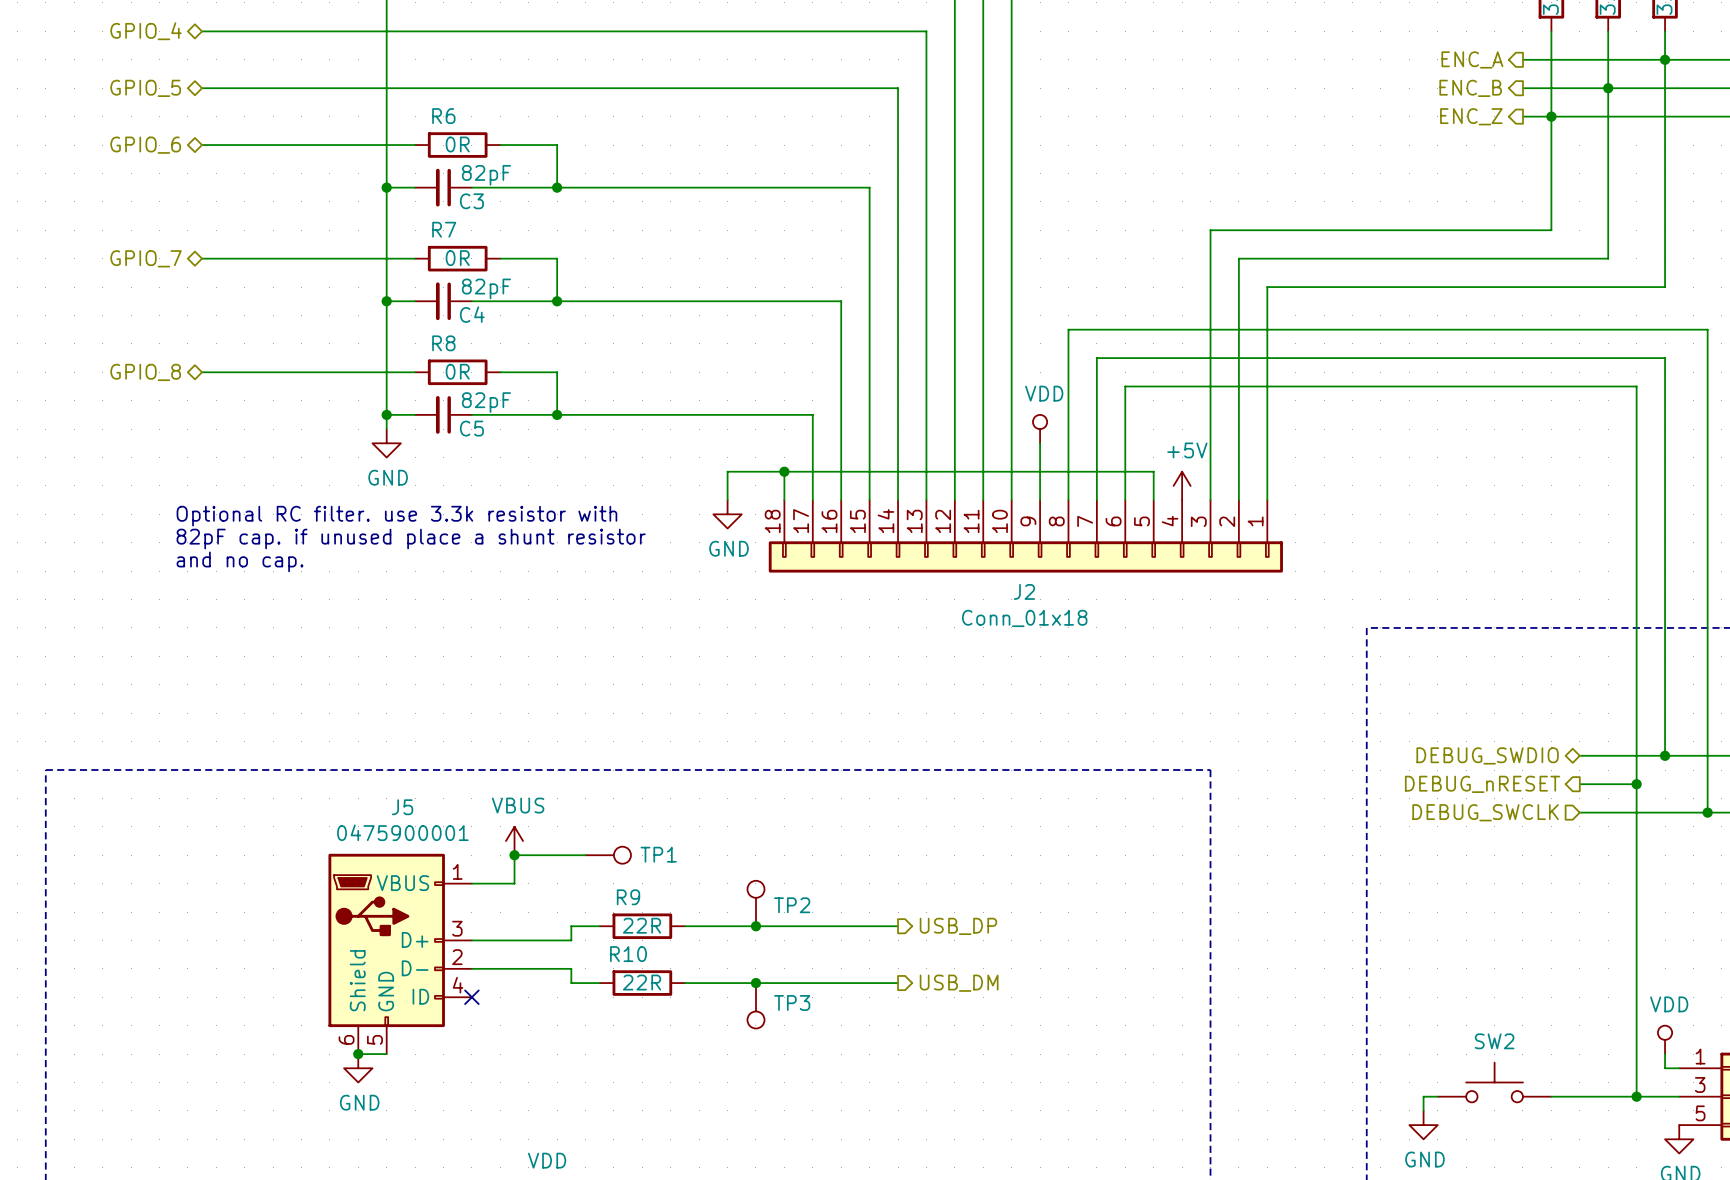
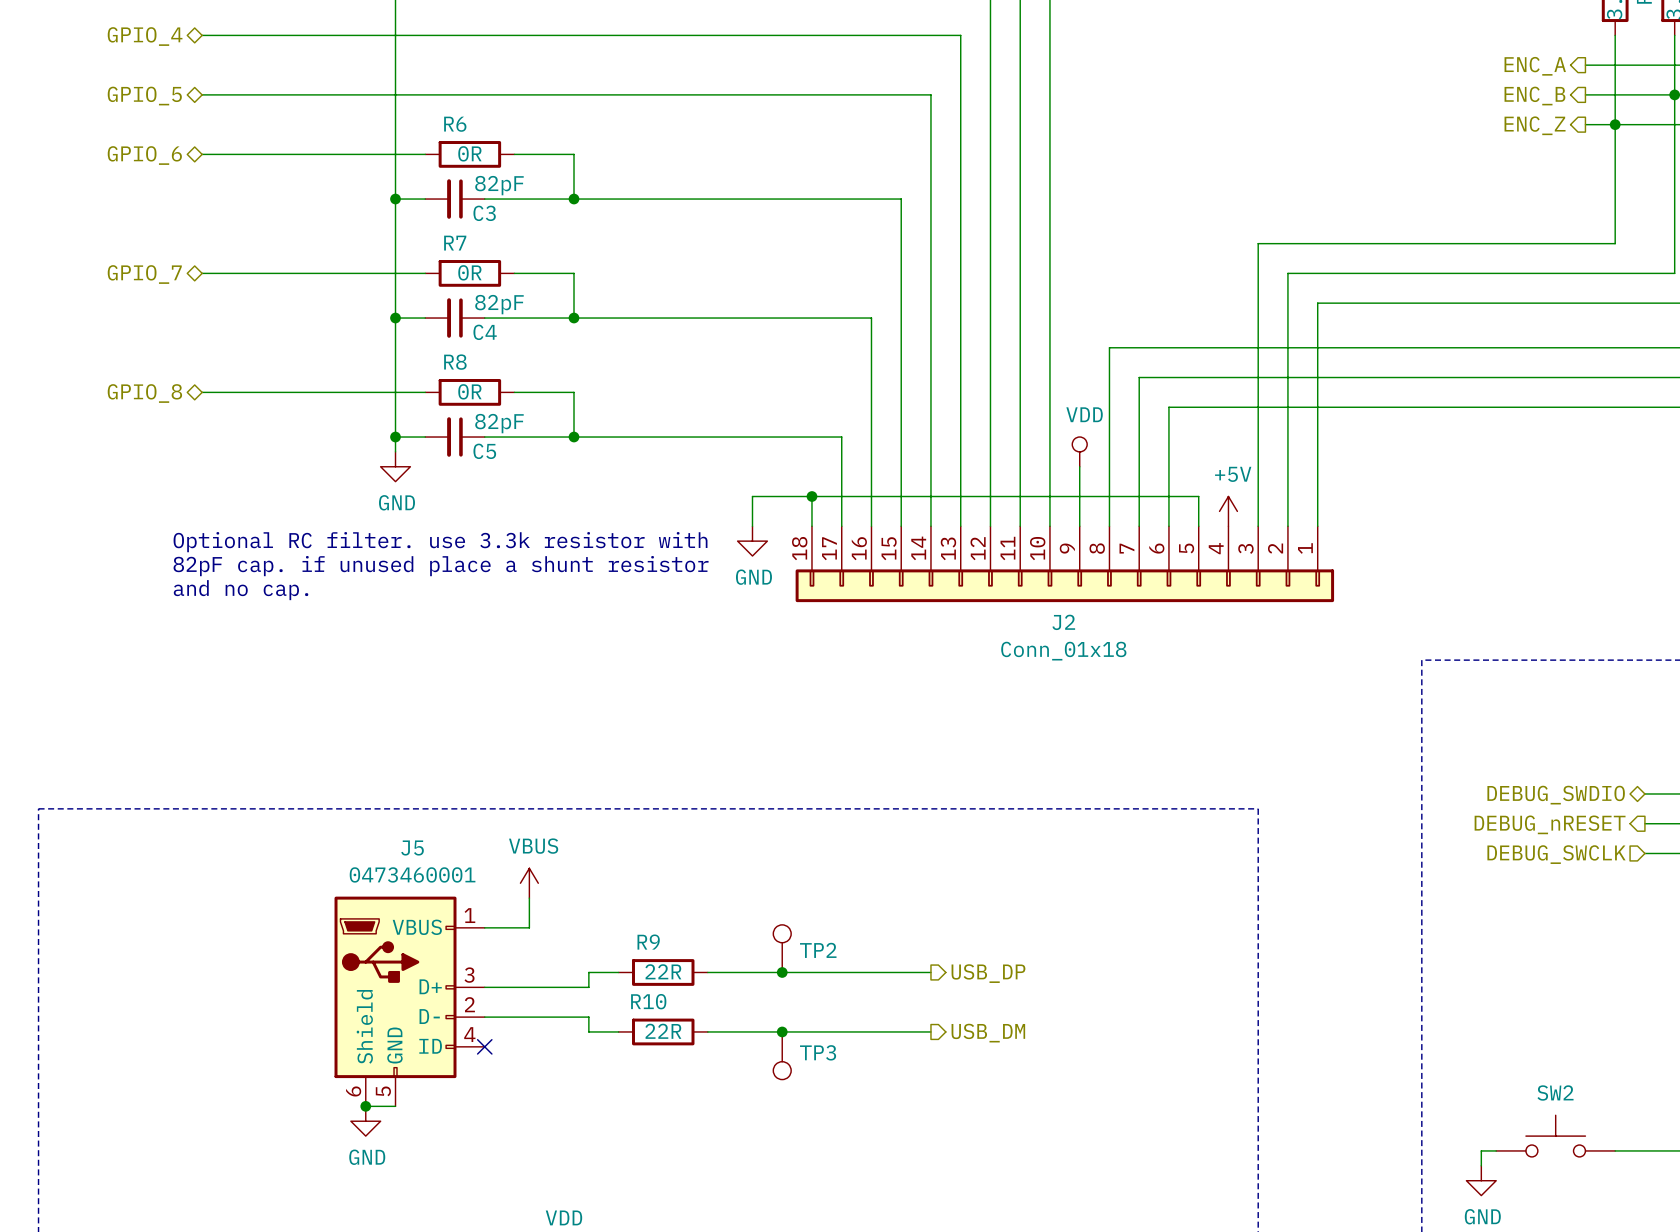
J5 value: 0475900001 (402, 832) -> 0473460001 (412, 874)
wire: (514, 855) (585, 855) -> none
junction: (514, 855) -> none
TP1: (608, 855) -> none

